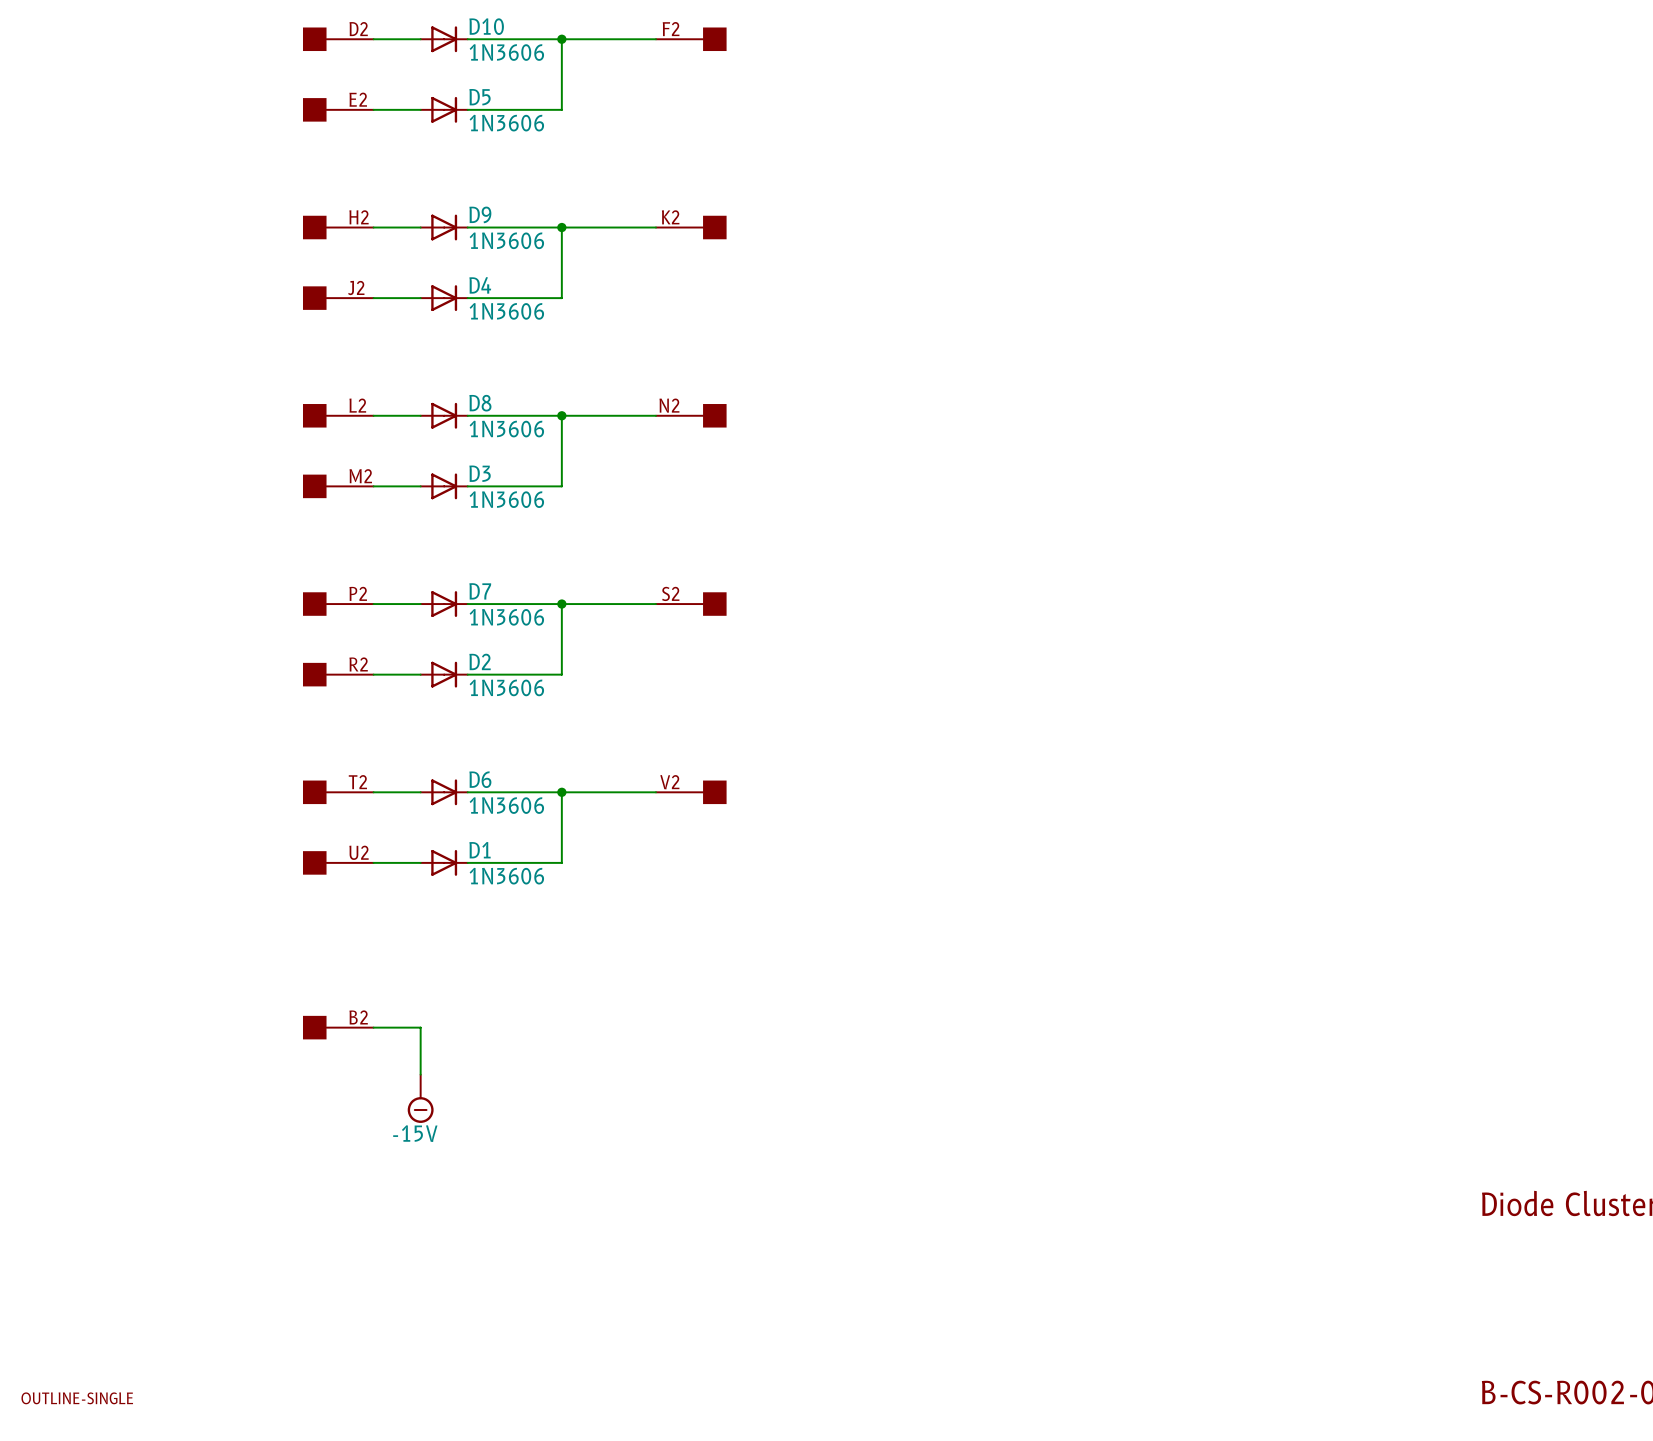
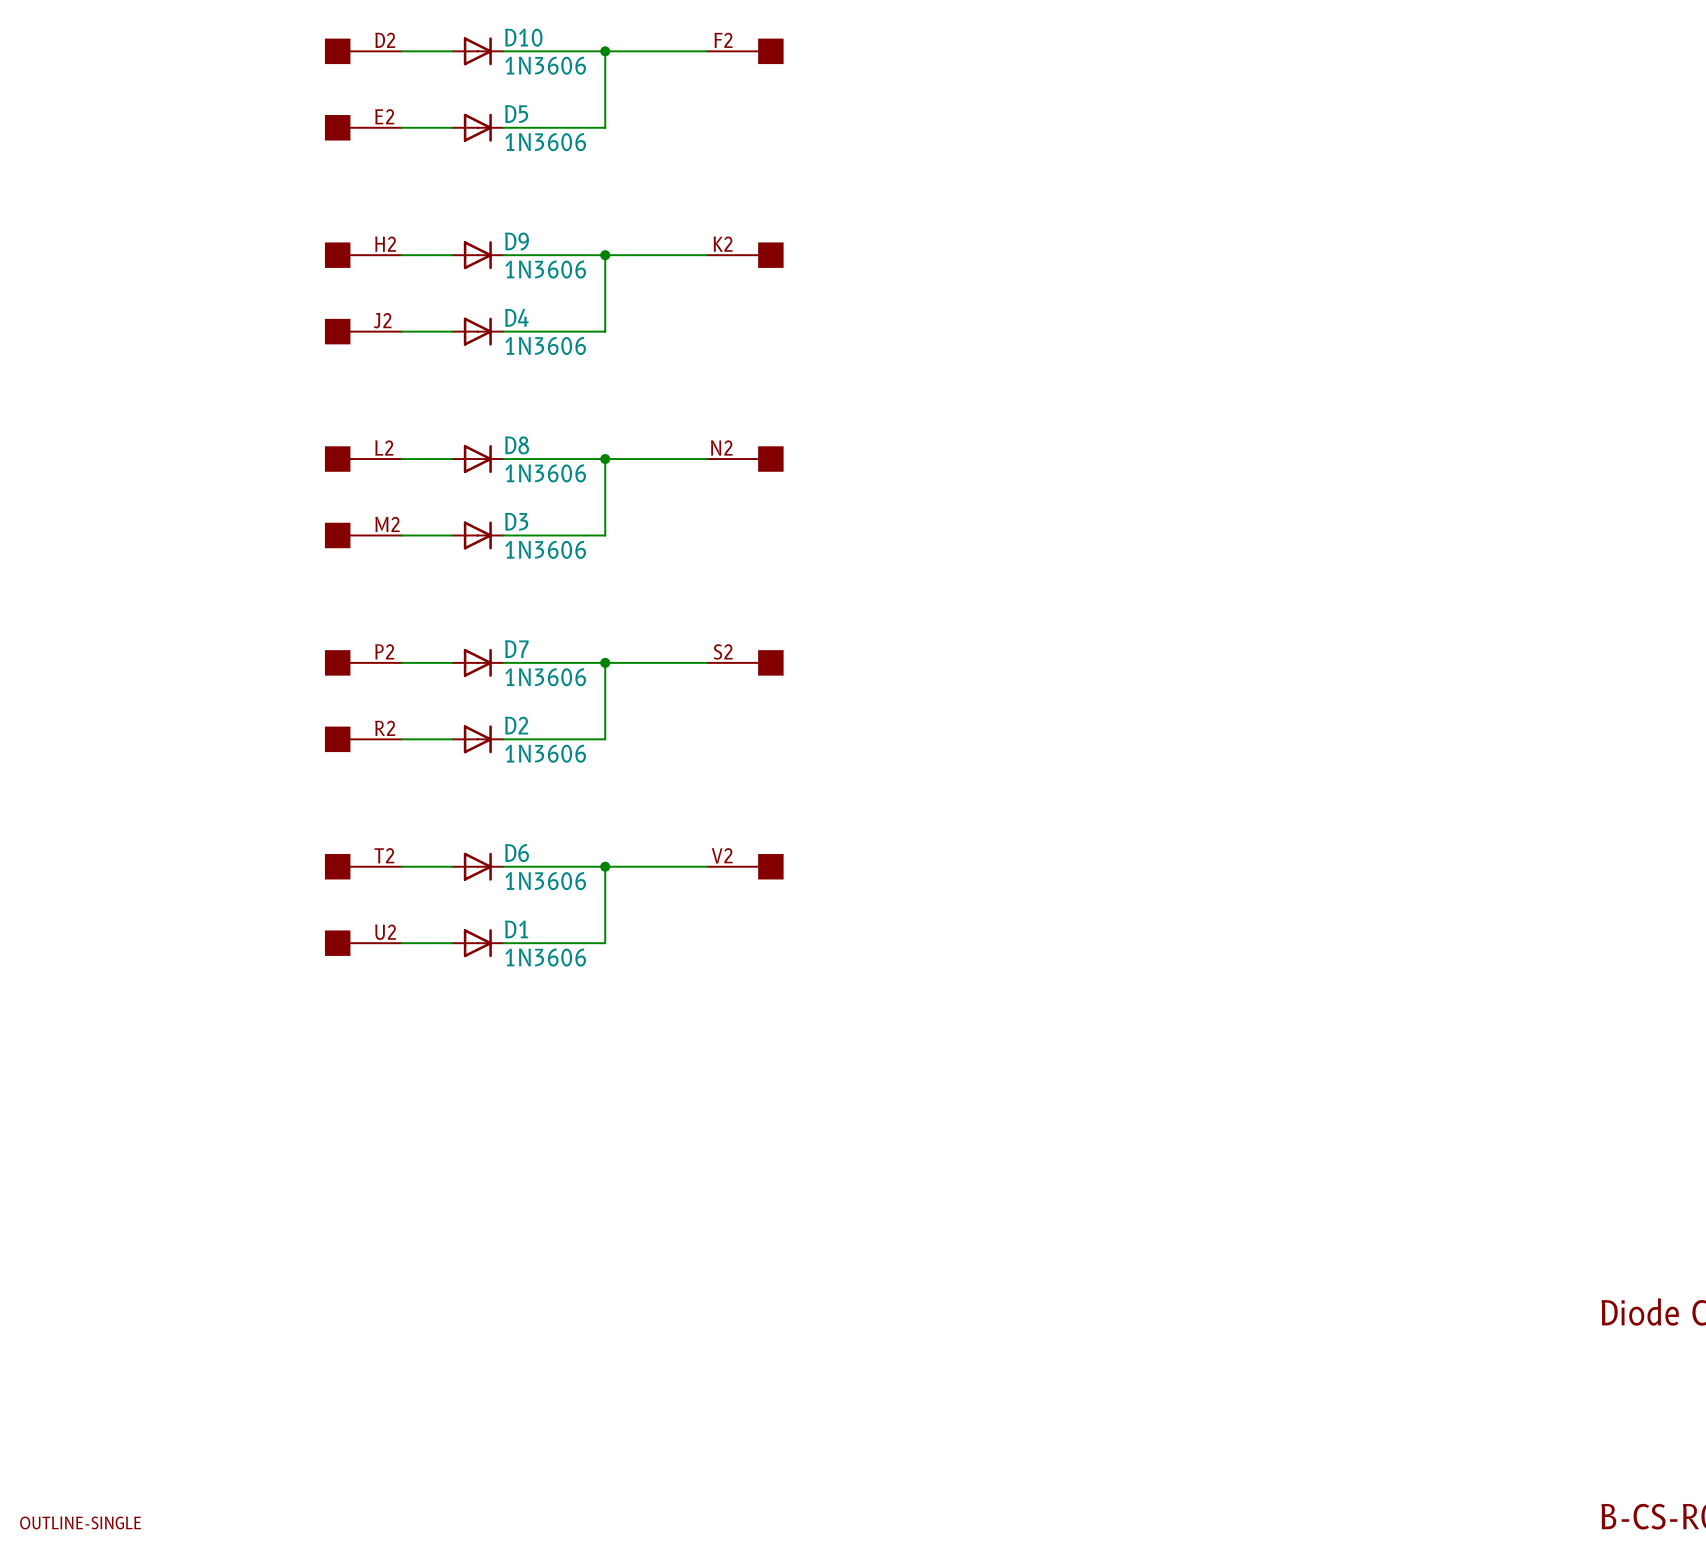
part: (338, 1027) -> none
wire: (373, 1027) (420, 1027) (420, 1074) -> none
power symbol: -15V (420, 1098) -> none

